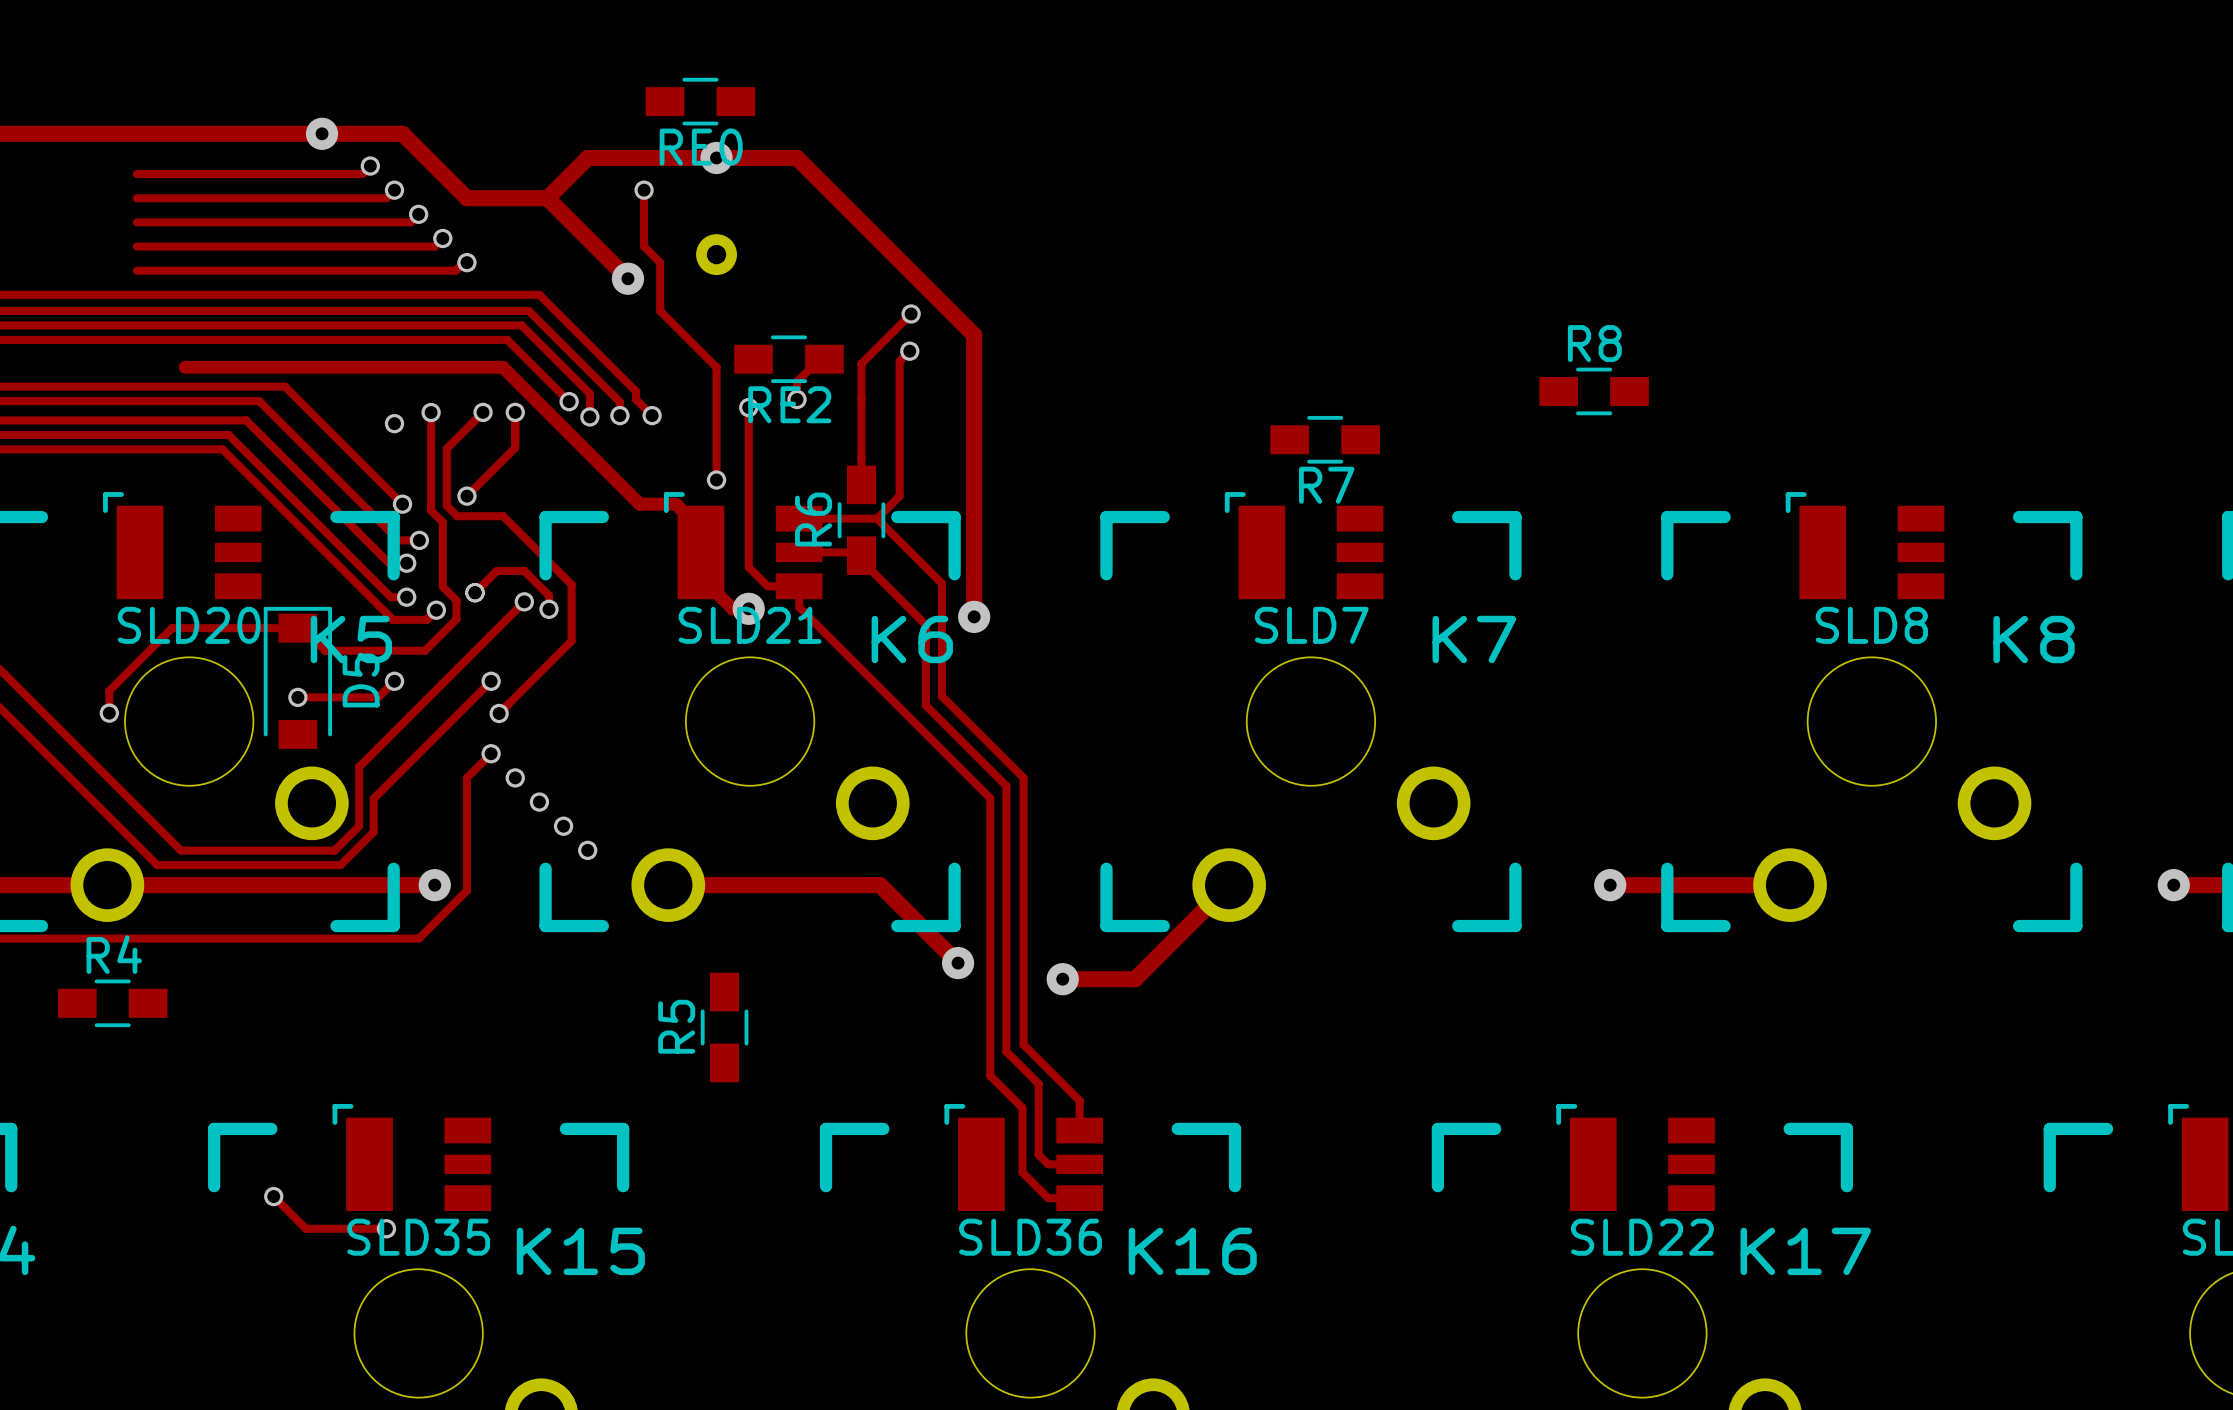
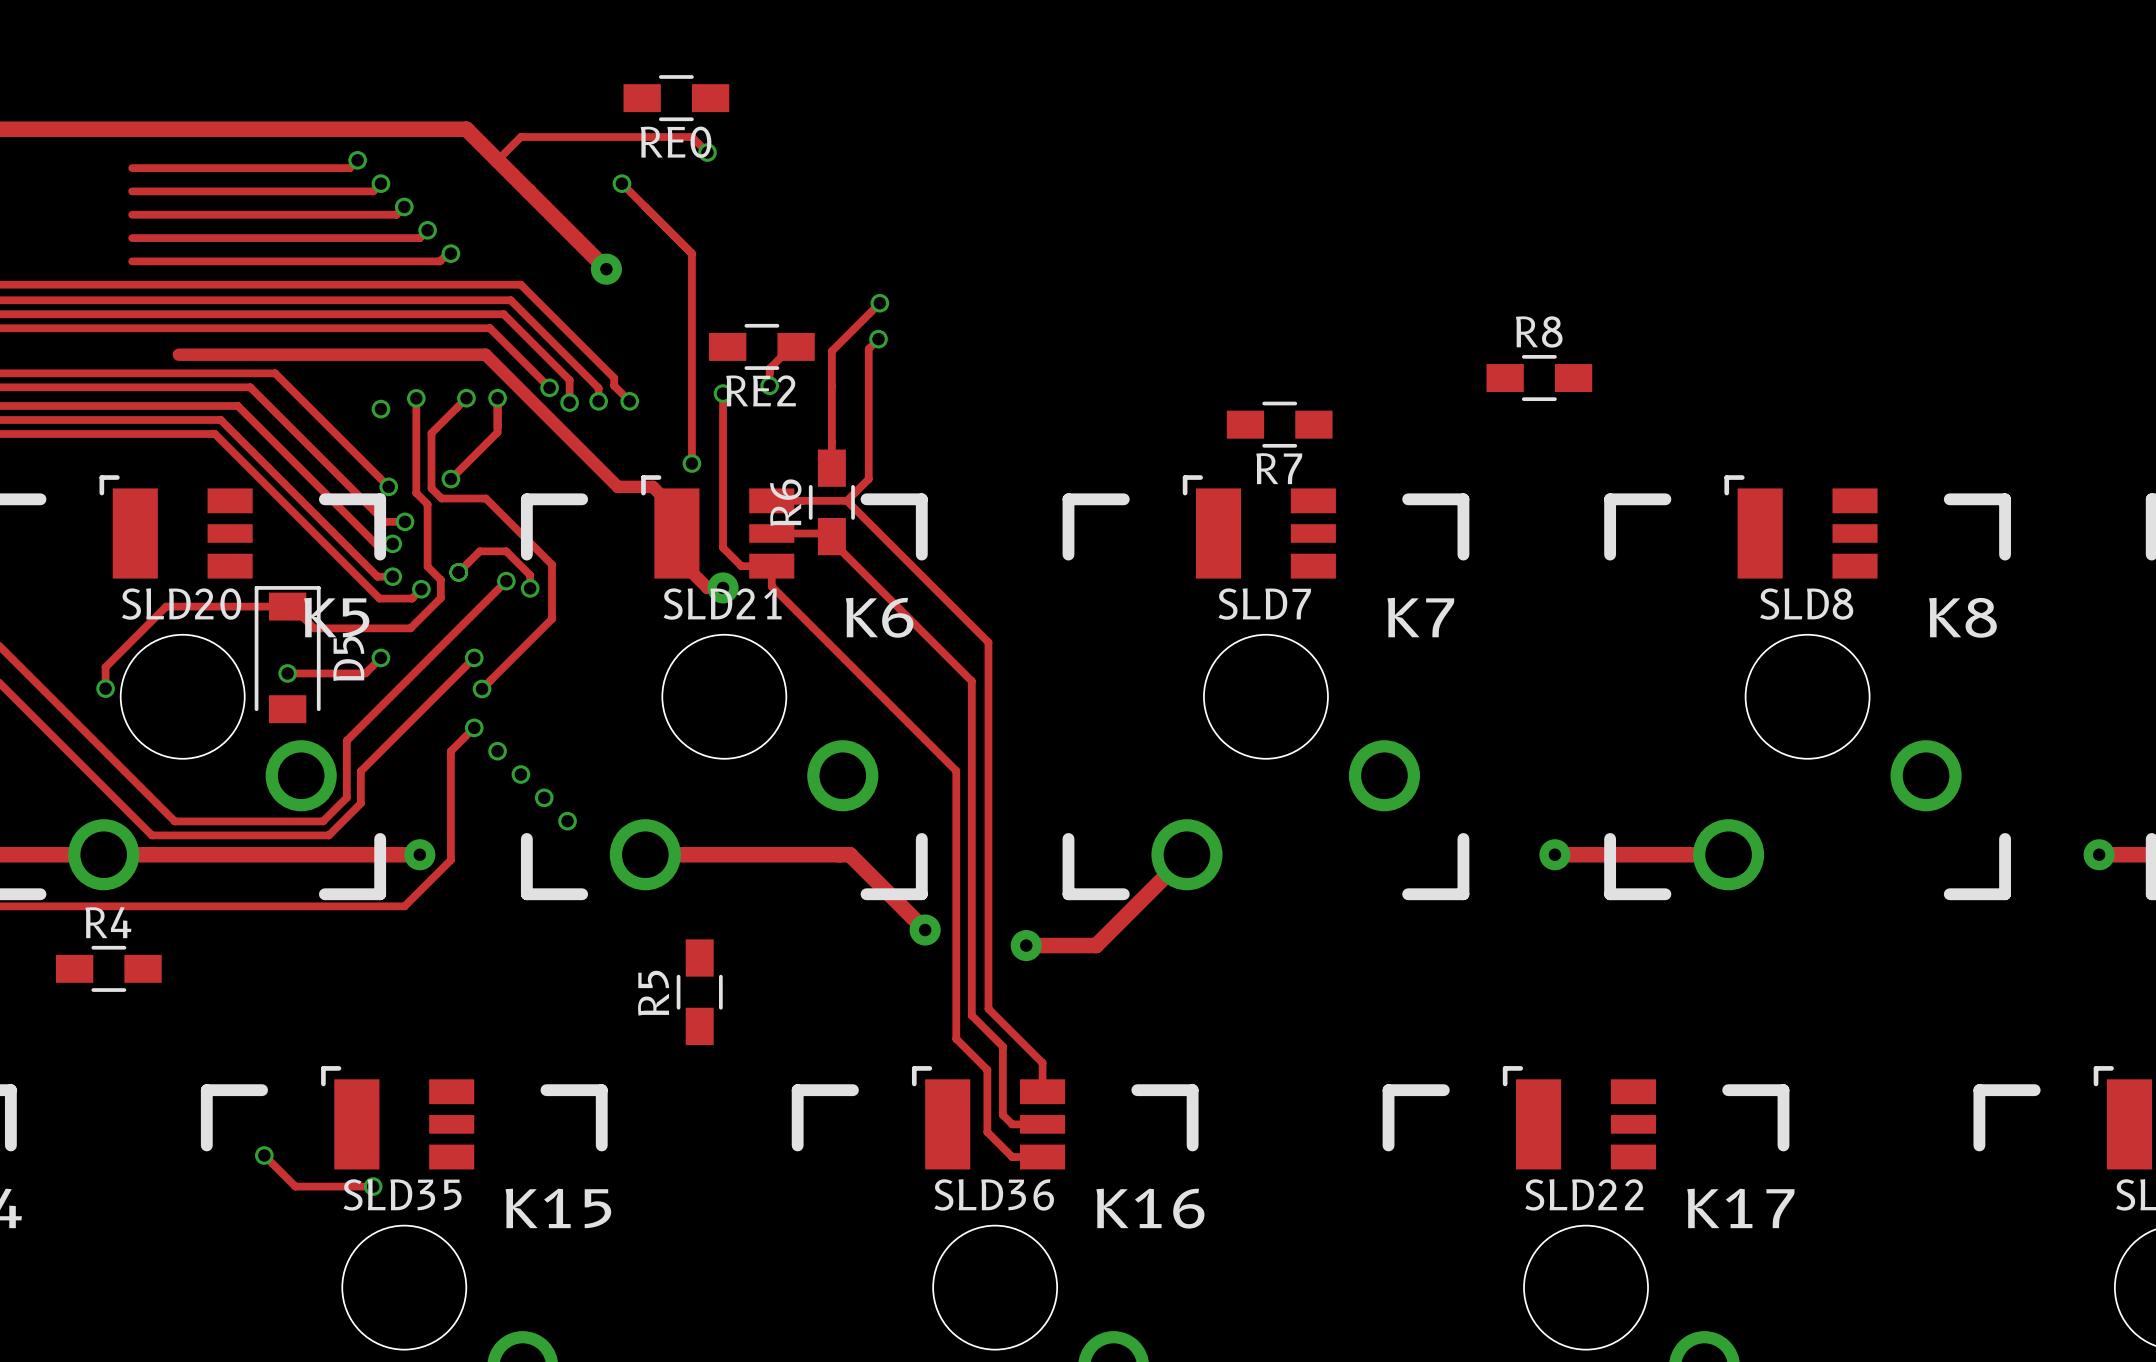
via: (322, 133) -> none
track: (402, 133) (466, 198) (547, 198) (587, 157) (716, 157) -> (388, 129) (466, 129) (528, 191)
via size: [700, 141, 733, 175] -> [698, 143, 717, 162]
track: (732, 157) (797, 157) (974, 335) (974, 616) -> (707, 152) (691, 137) (520, 137) (497, 160)
track: (644, 190) (644, 246) (660, 262) (660, 310) (716, 367) -> (621, 183) (691, 253) (691, 354)
part: (716, 254) -> none
track: (941, 583) (941, 696) (1023, 777) -> (909, 563) (988, 642) (988, 751)
via: (974, 616) -> none
track: (925, 624) (925, 705) (1006, 785) -> (894, 603) (971, 681) (971, 758)

